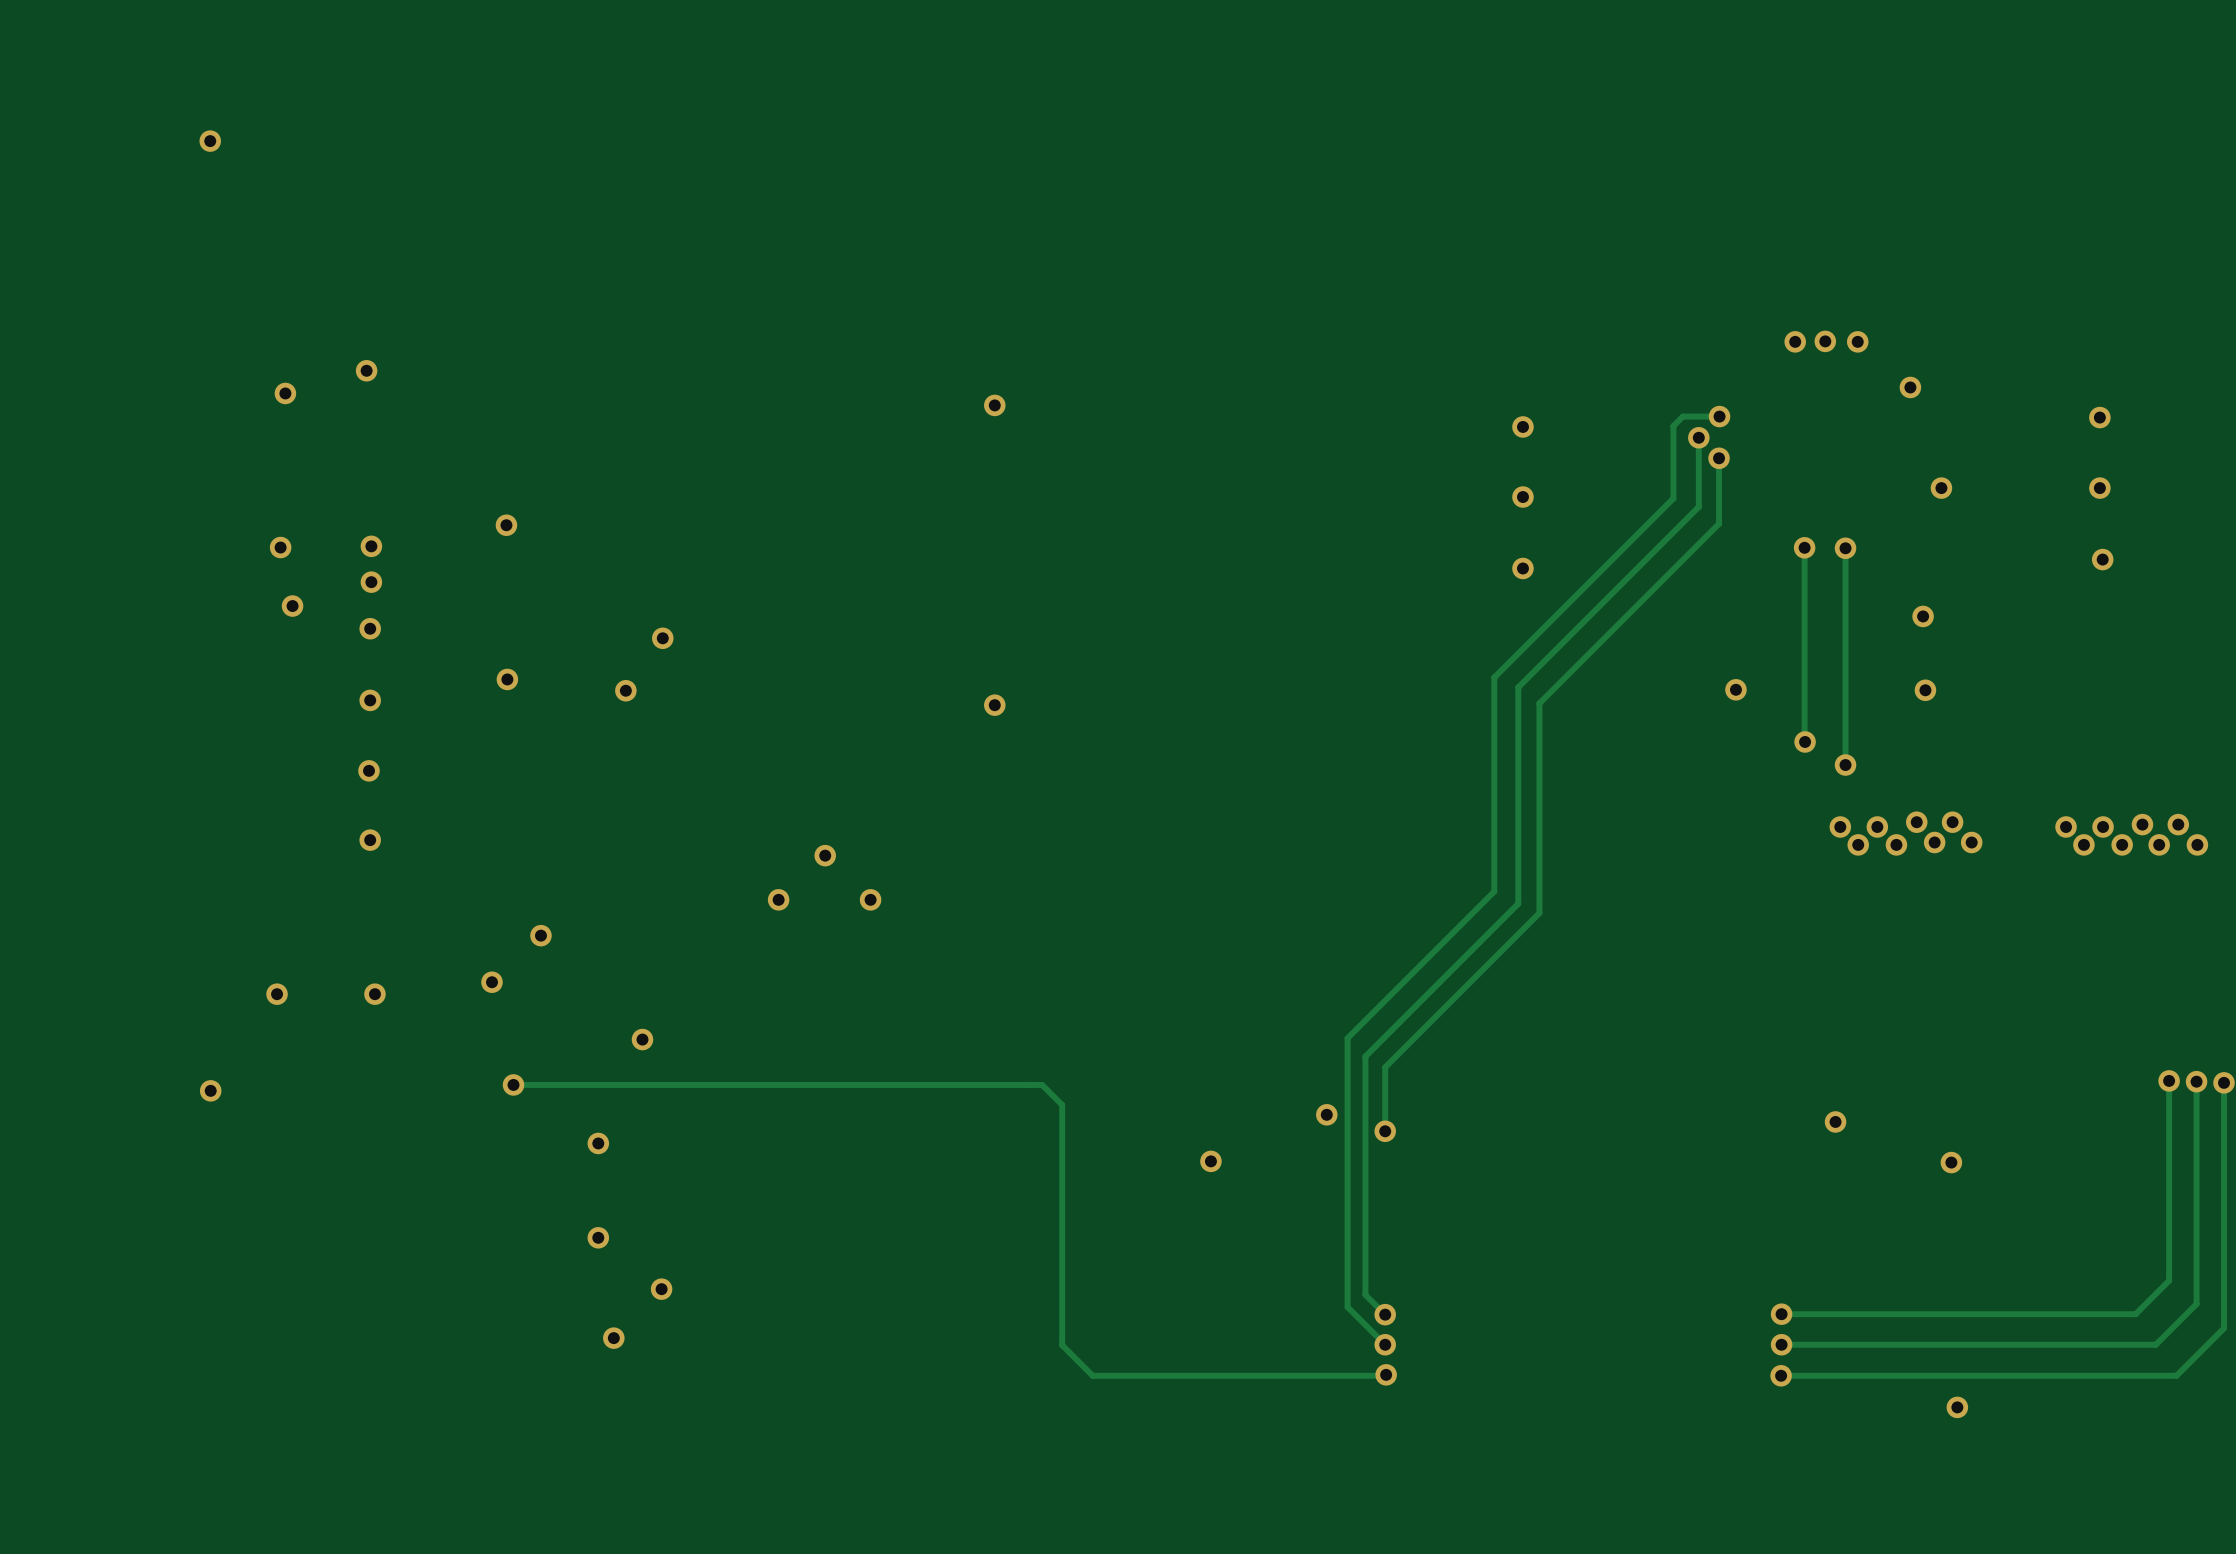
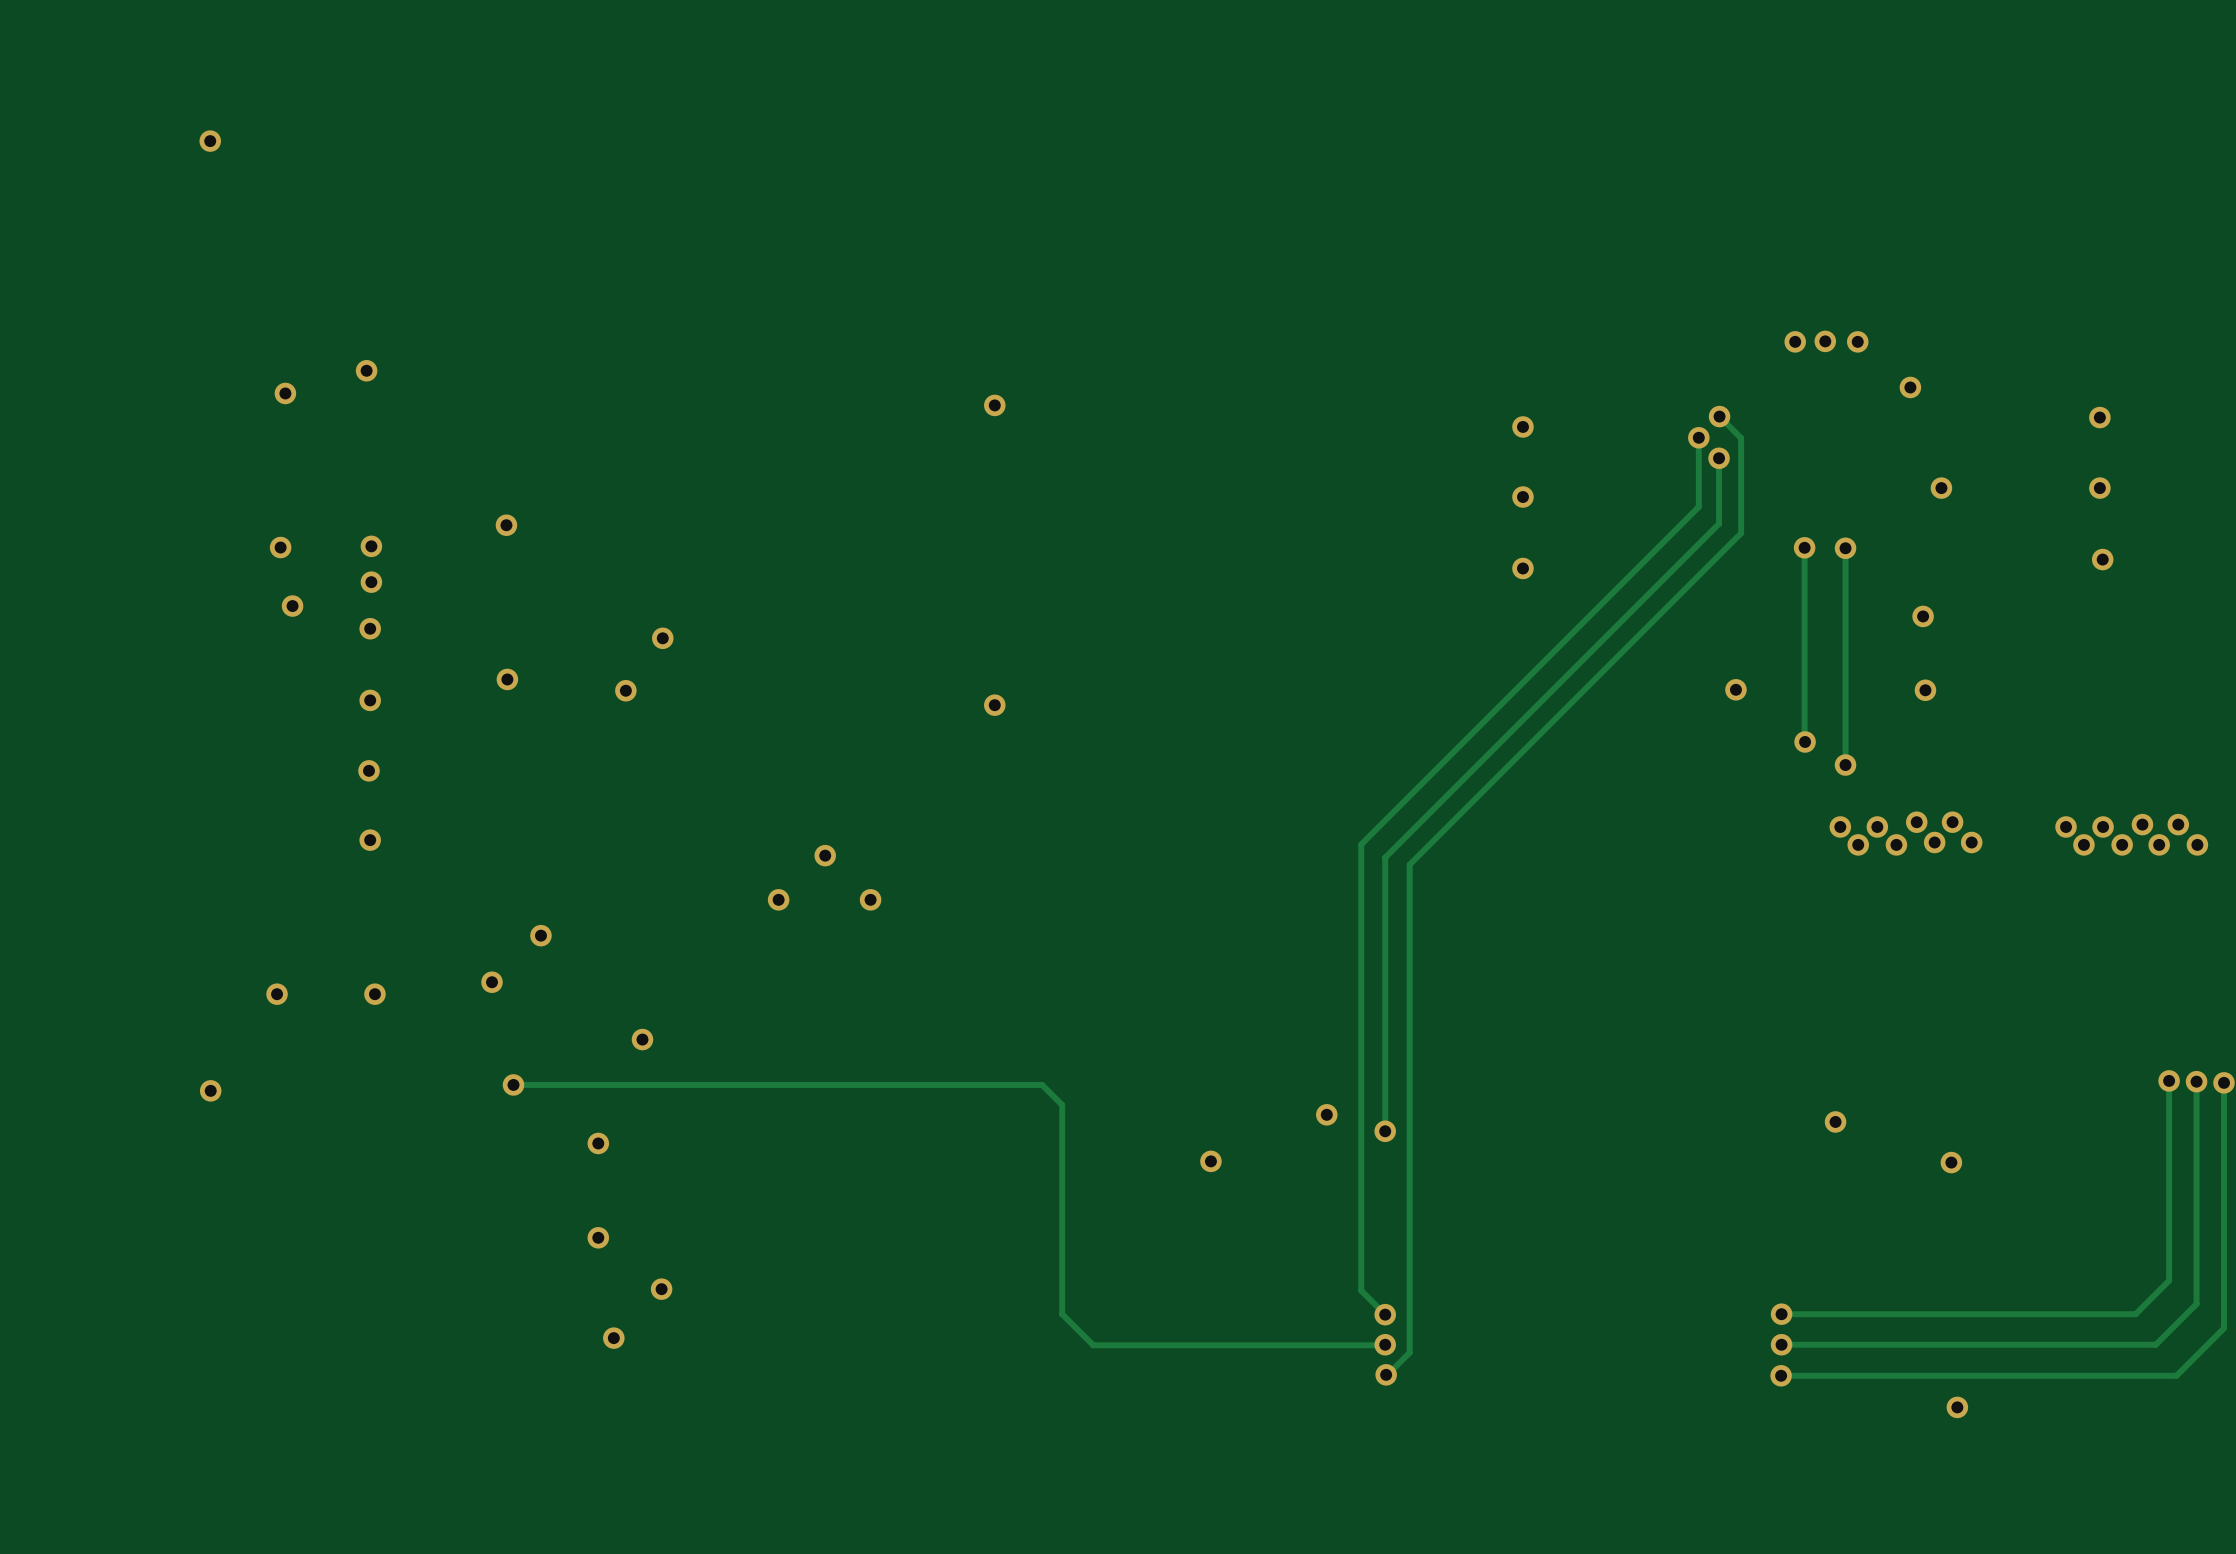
track: (1719, 416) (1682, 416) (1673, 426) (1673, 498) (1494, 677) (1494, 891) (1347, 1038) (1347, 1307) (1385, 1344) -> (1719, 416) (1741, 438) (1741, 533) (1409, 864) (1409, 1352) (1386, 1374)
track: (1518, 687) (1518, 903) (1365, 1056) (1365, 1294) -> (1518, 687) (1361, 844) (1361, 1290) (1365, 1294)
track: (1539, 703) (1539, 913) (1385, 1067) -> (1539, 703) (1385, 857) (1385, 1067)
track: (1062, 1314) (1062, 1345) (1092, 1375) (1385, 1375) -> (1062, 1314) (1093, 1345) (1385, 1345)

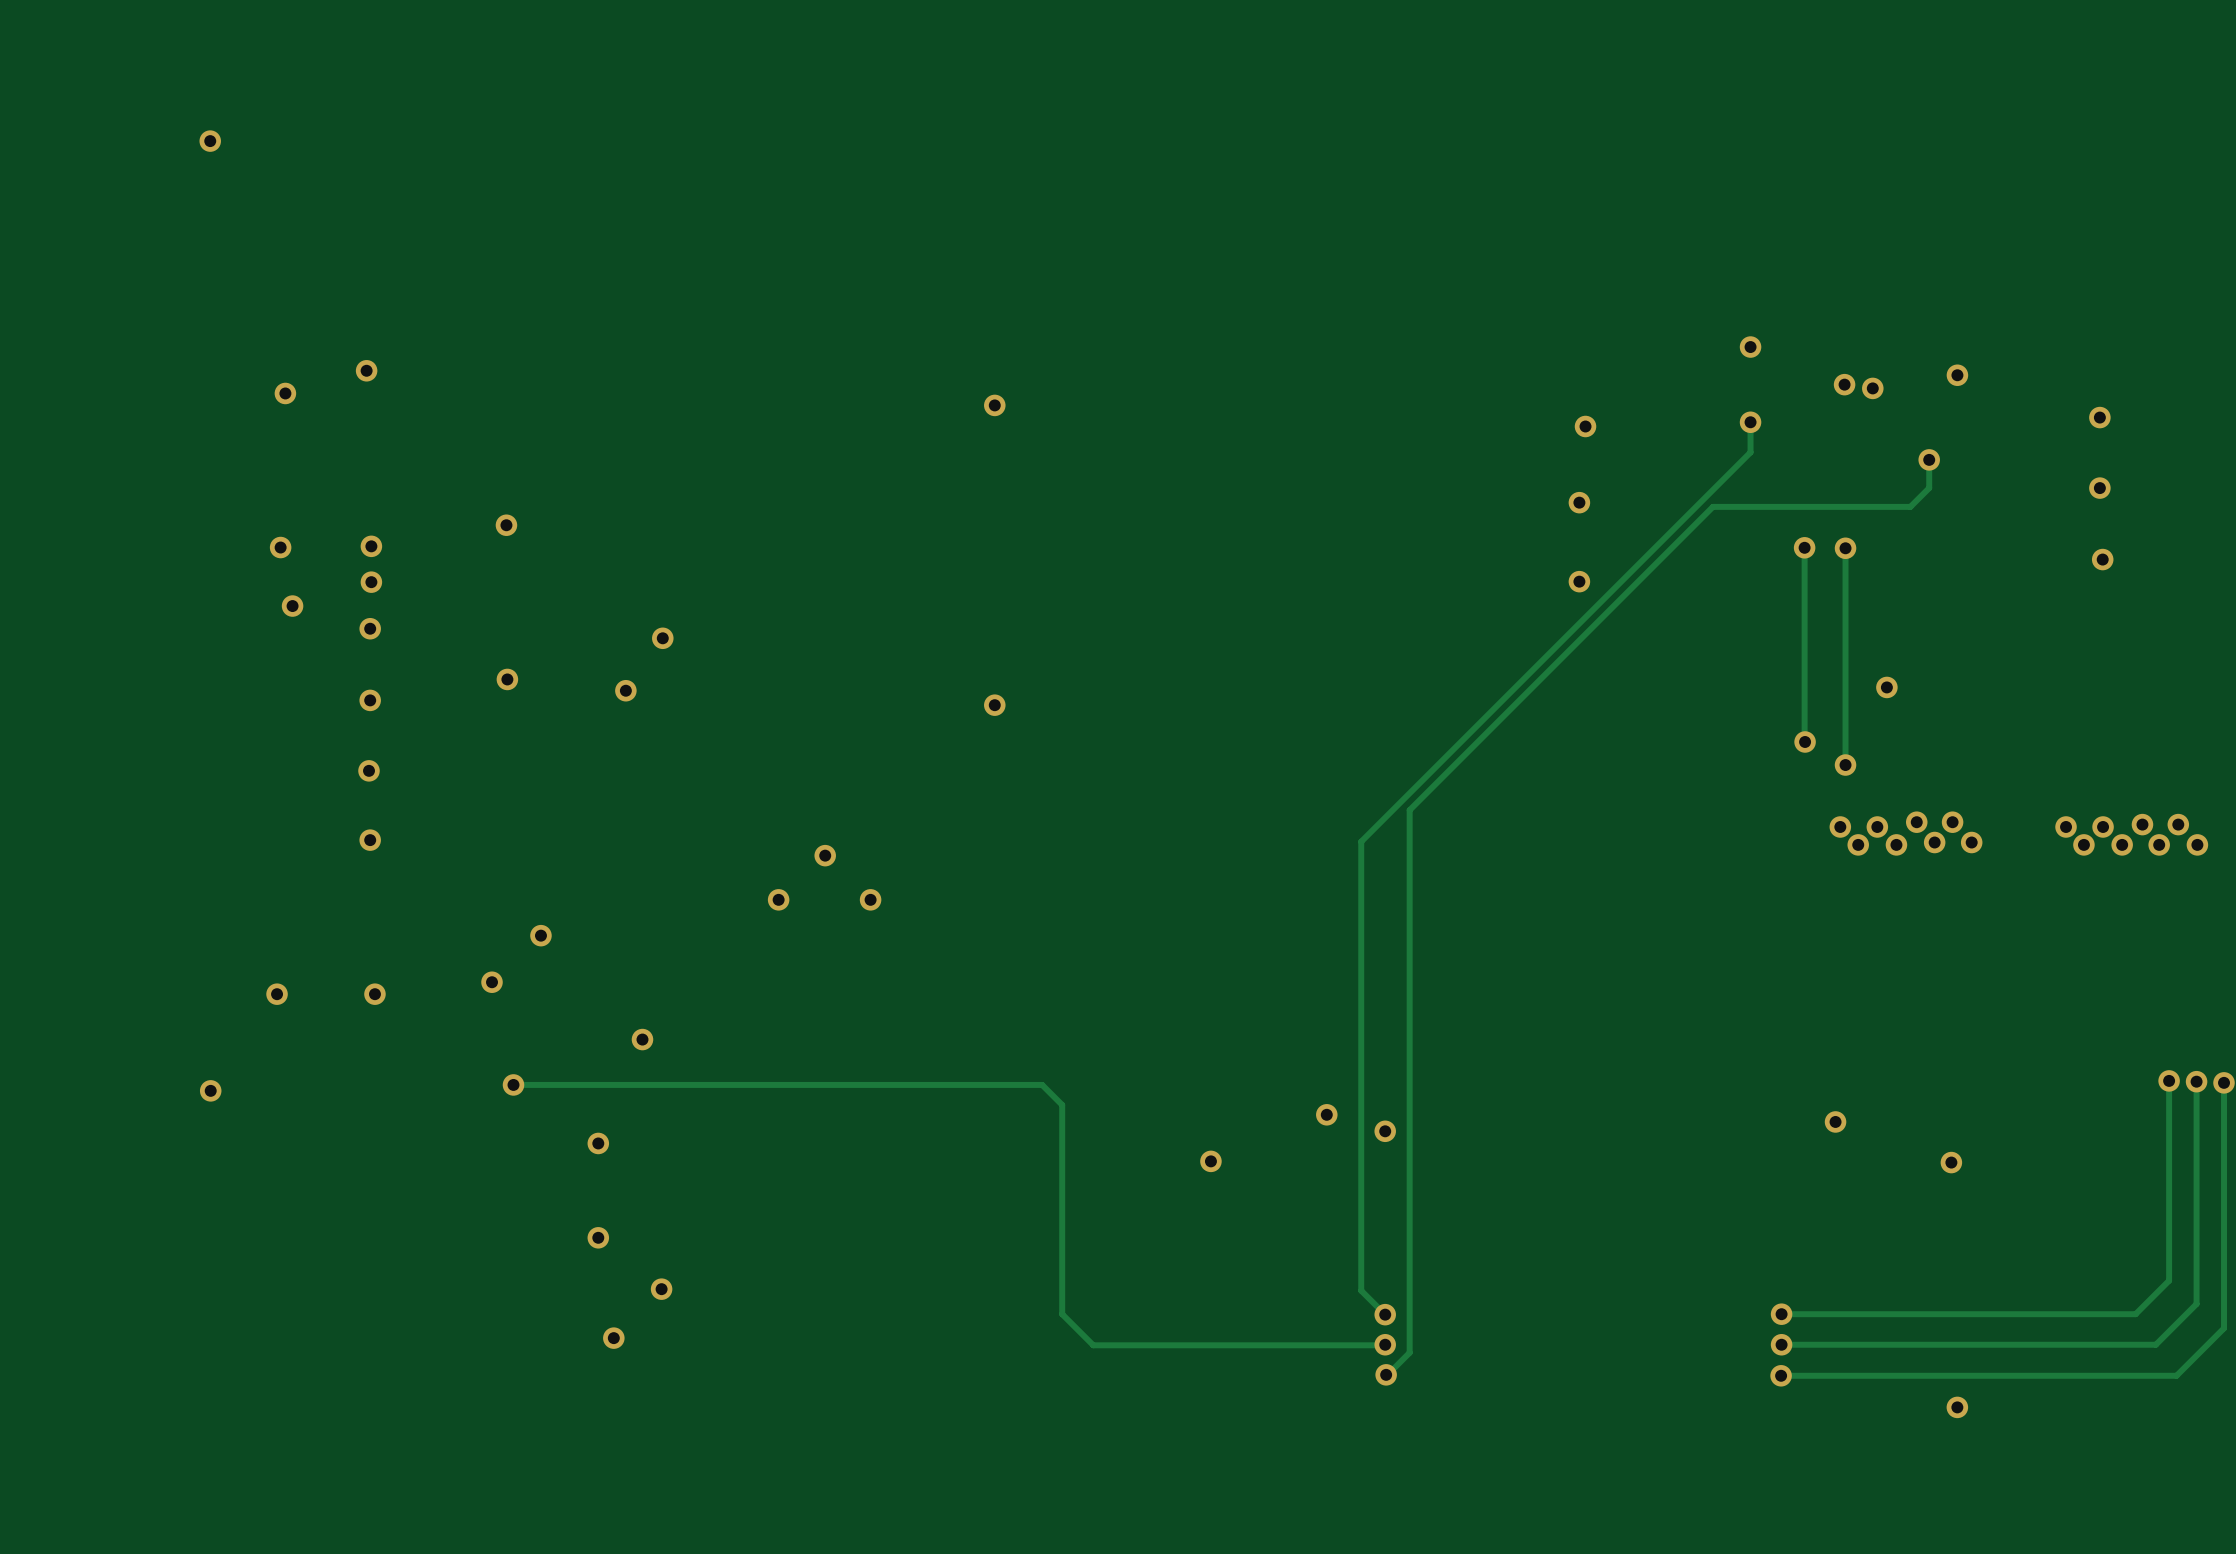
via: (1795, 341) -> none
via: (1825, 341) -> none
via: (1857, 341) -> none
via: none -> (1750, 347)
via: none -> (1957, 375)
via: none -> (1844, 384)
via: (1910, 387) -> none
via: none -> (1872, 388)
track: (1719, 416) (1741, 438) (1741, 533) (1409, 864) -> (1929, 459) (1929, 488) (1910, 506) (1712, 506) (1409, 810) (1409, 864)
via: (1719, 416) -> none
via: none -> (1750, 422)
via: (1522, 426) -> none
via: none -> (1585, 426)
track: (1698, 437) (1698, 506) (1361, 844) -> (1750, 422) (1750, 452) (1361, 841) (1361, 844)
via: (1698, 437) -> none
track: (1719, 458) (1719, 523) (1385, 857) (1385, 1131) -> none
via: (1719, 458) -> none
via position: (1941, 488) -> (1929, 459)
via: (1522, 497) -> none
via: none -> (1579, 502)
via: (1522, 568) -> none
via: none -> (1579, 581)
via: (1923, 616) -> none
via: (1735, 689) -> none
via position: (1925, 690) -> (1886, 687)

